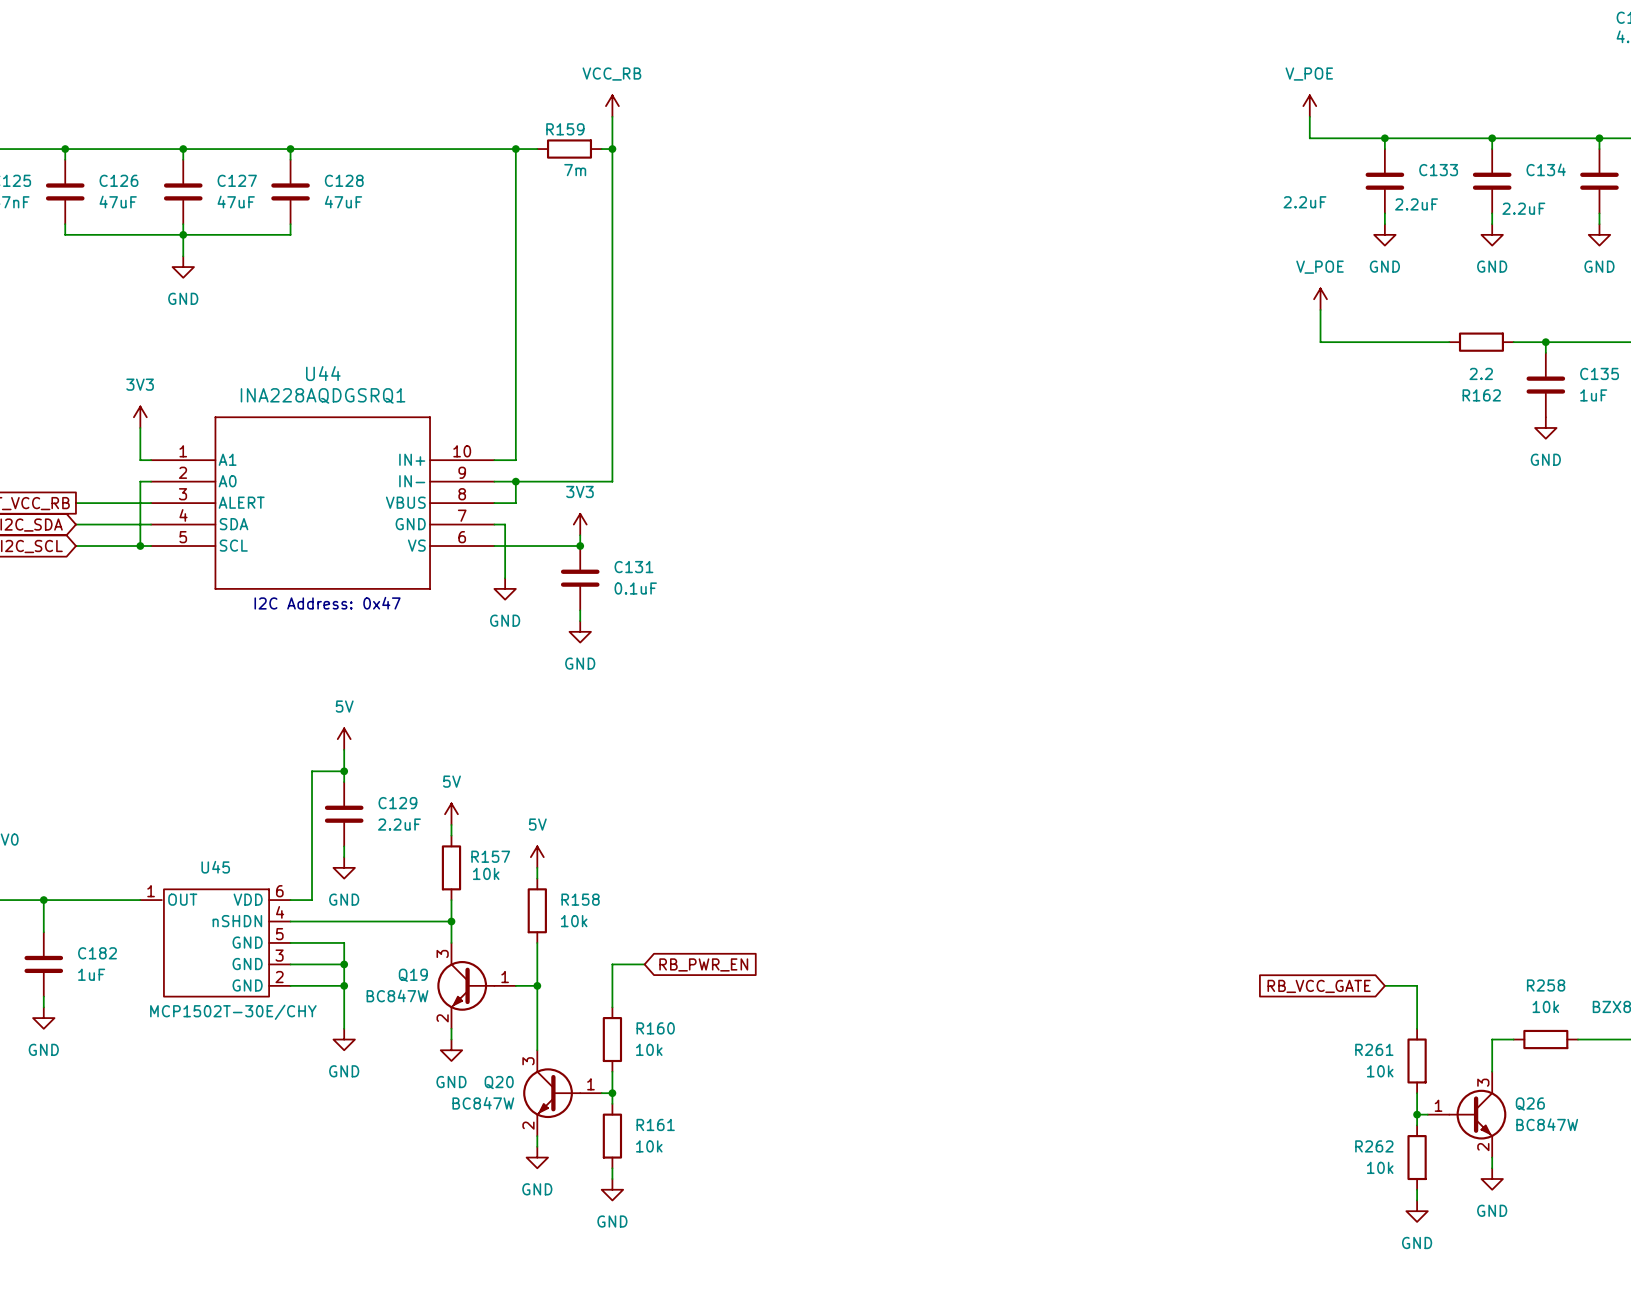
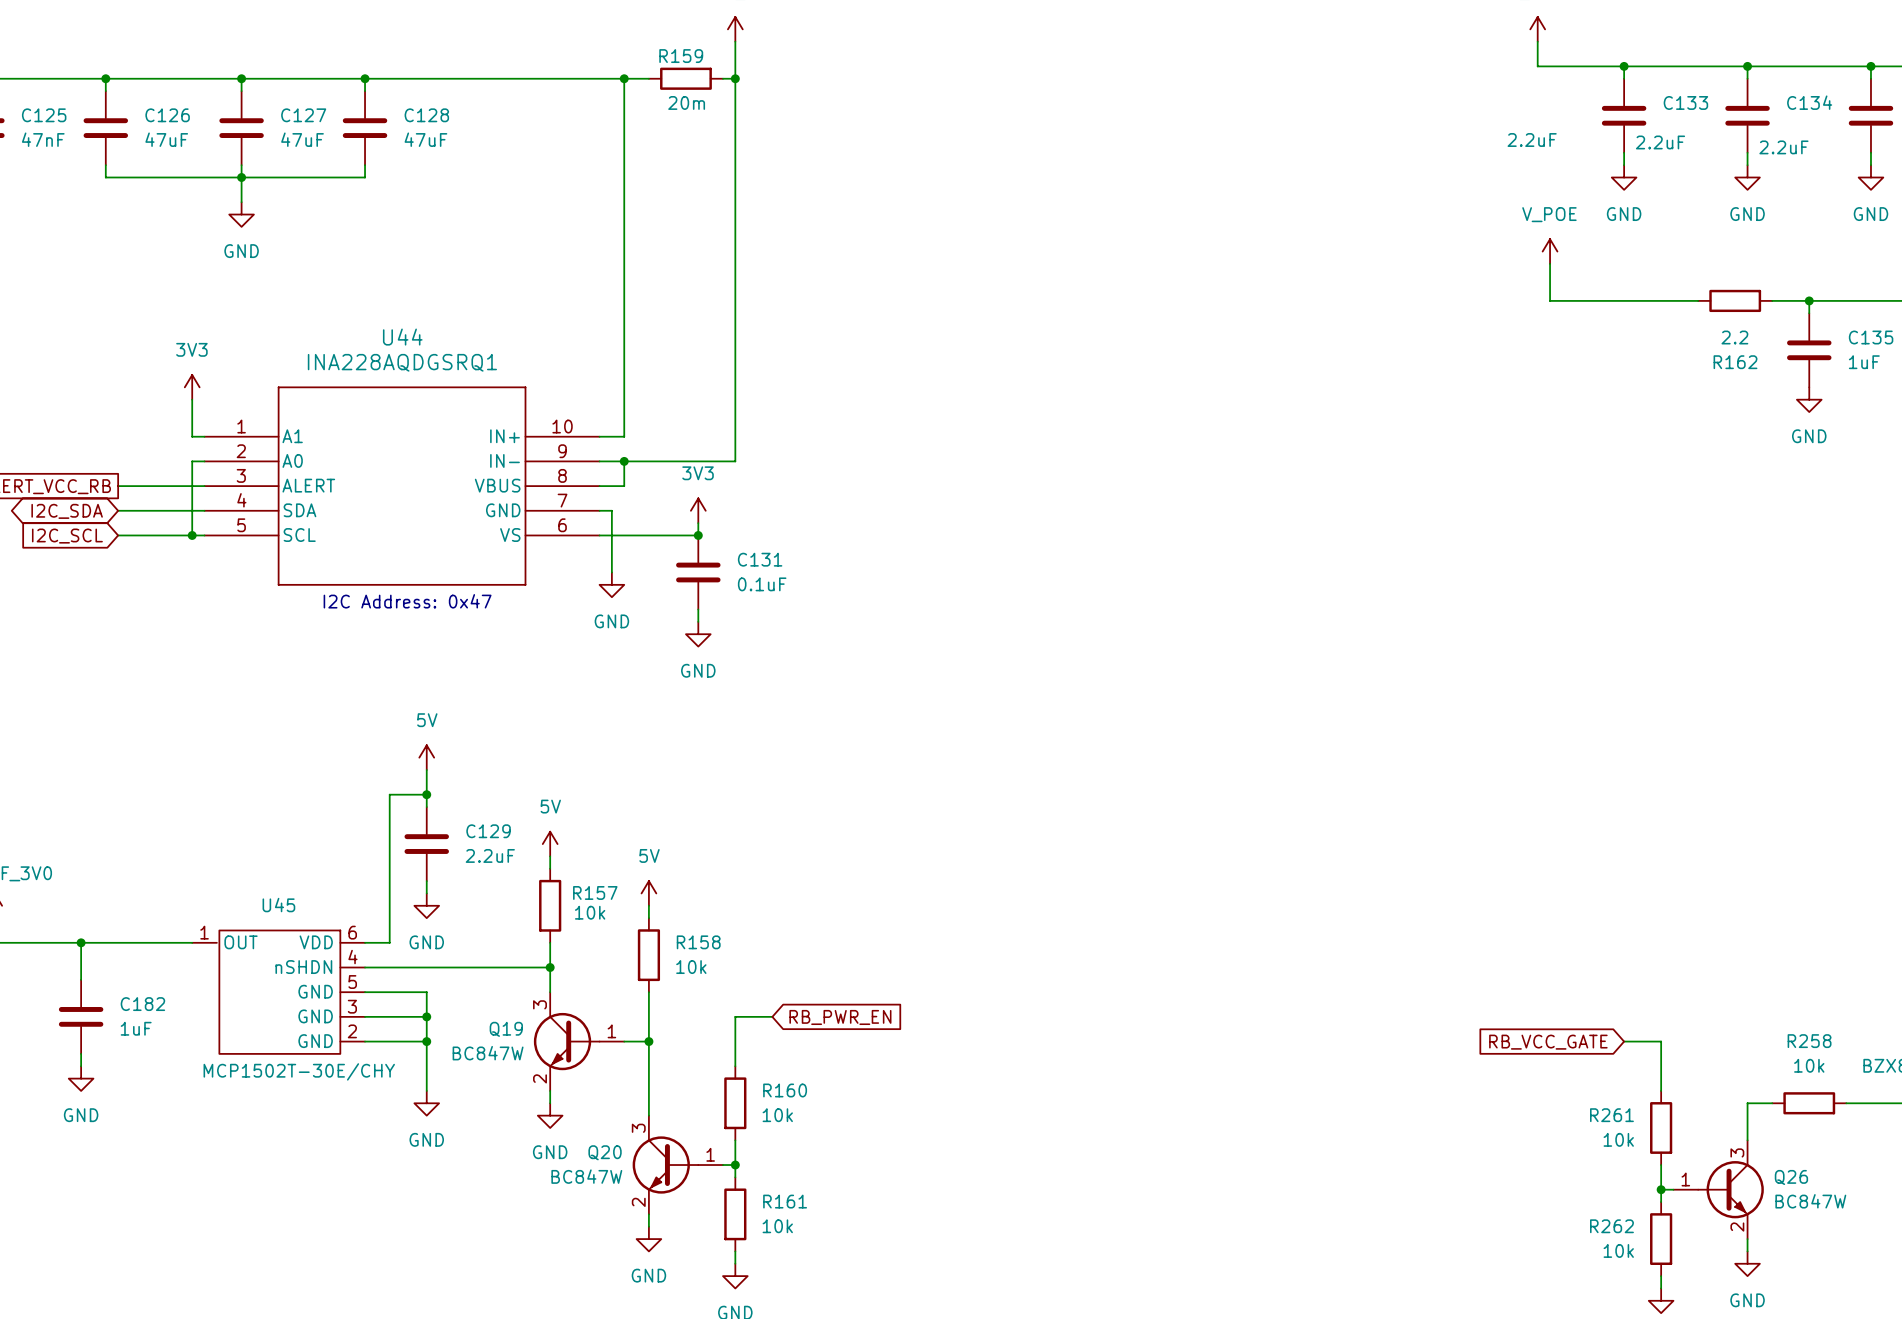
R159 value: 7m (575, 170) -> 20m (686, 102)

